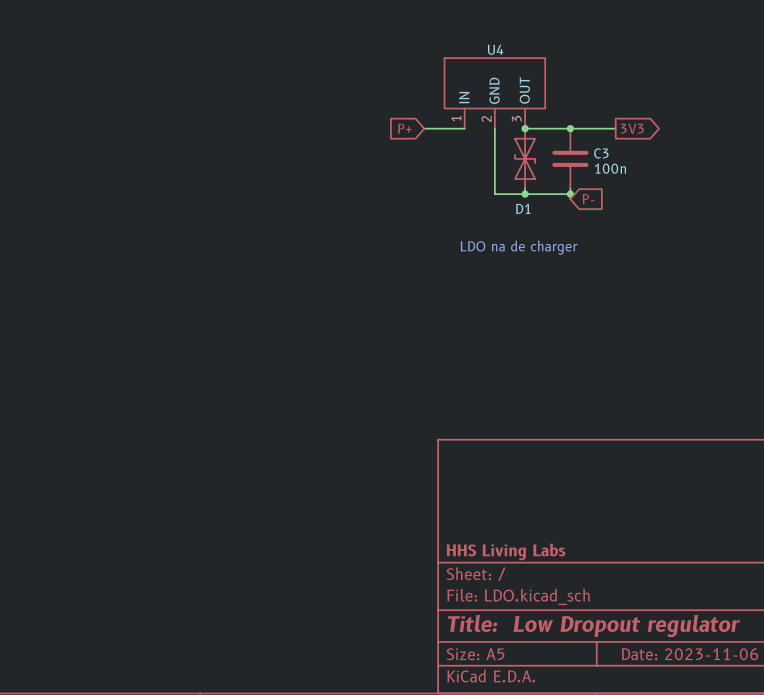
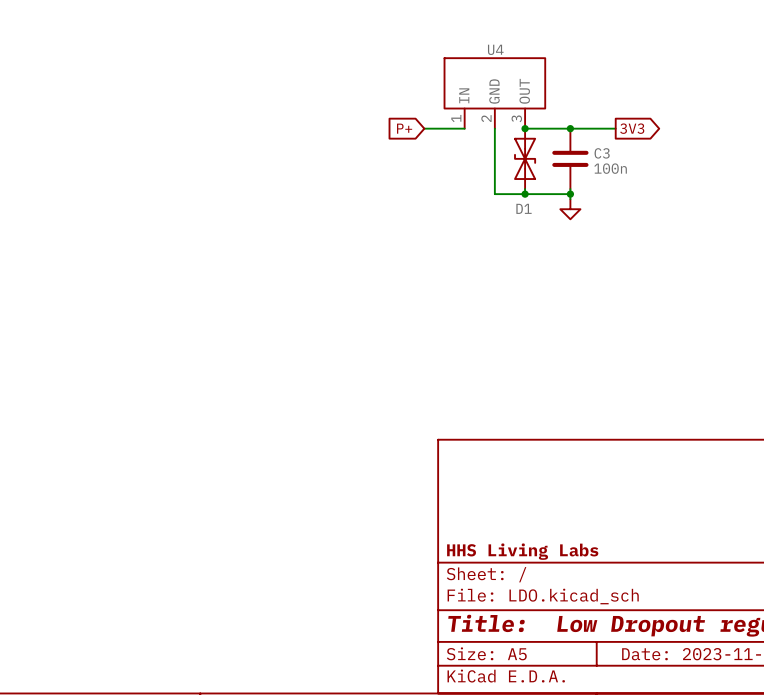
global label: P- (588, 199) -> none
power symbol: none -> (570, 209)
text: LDO na de charger (519, 247) -> none

